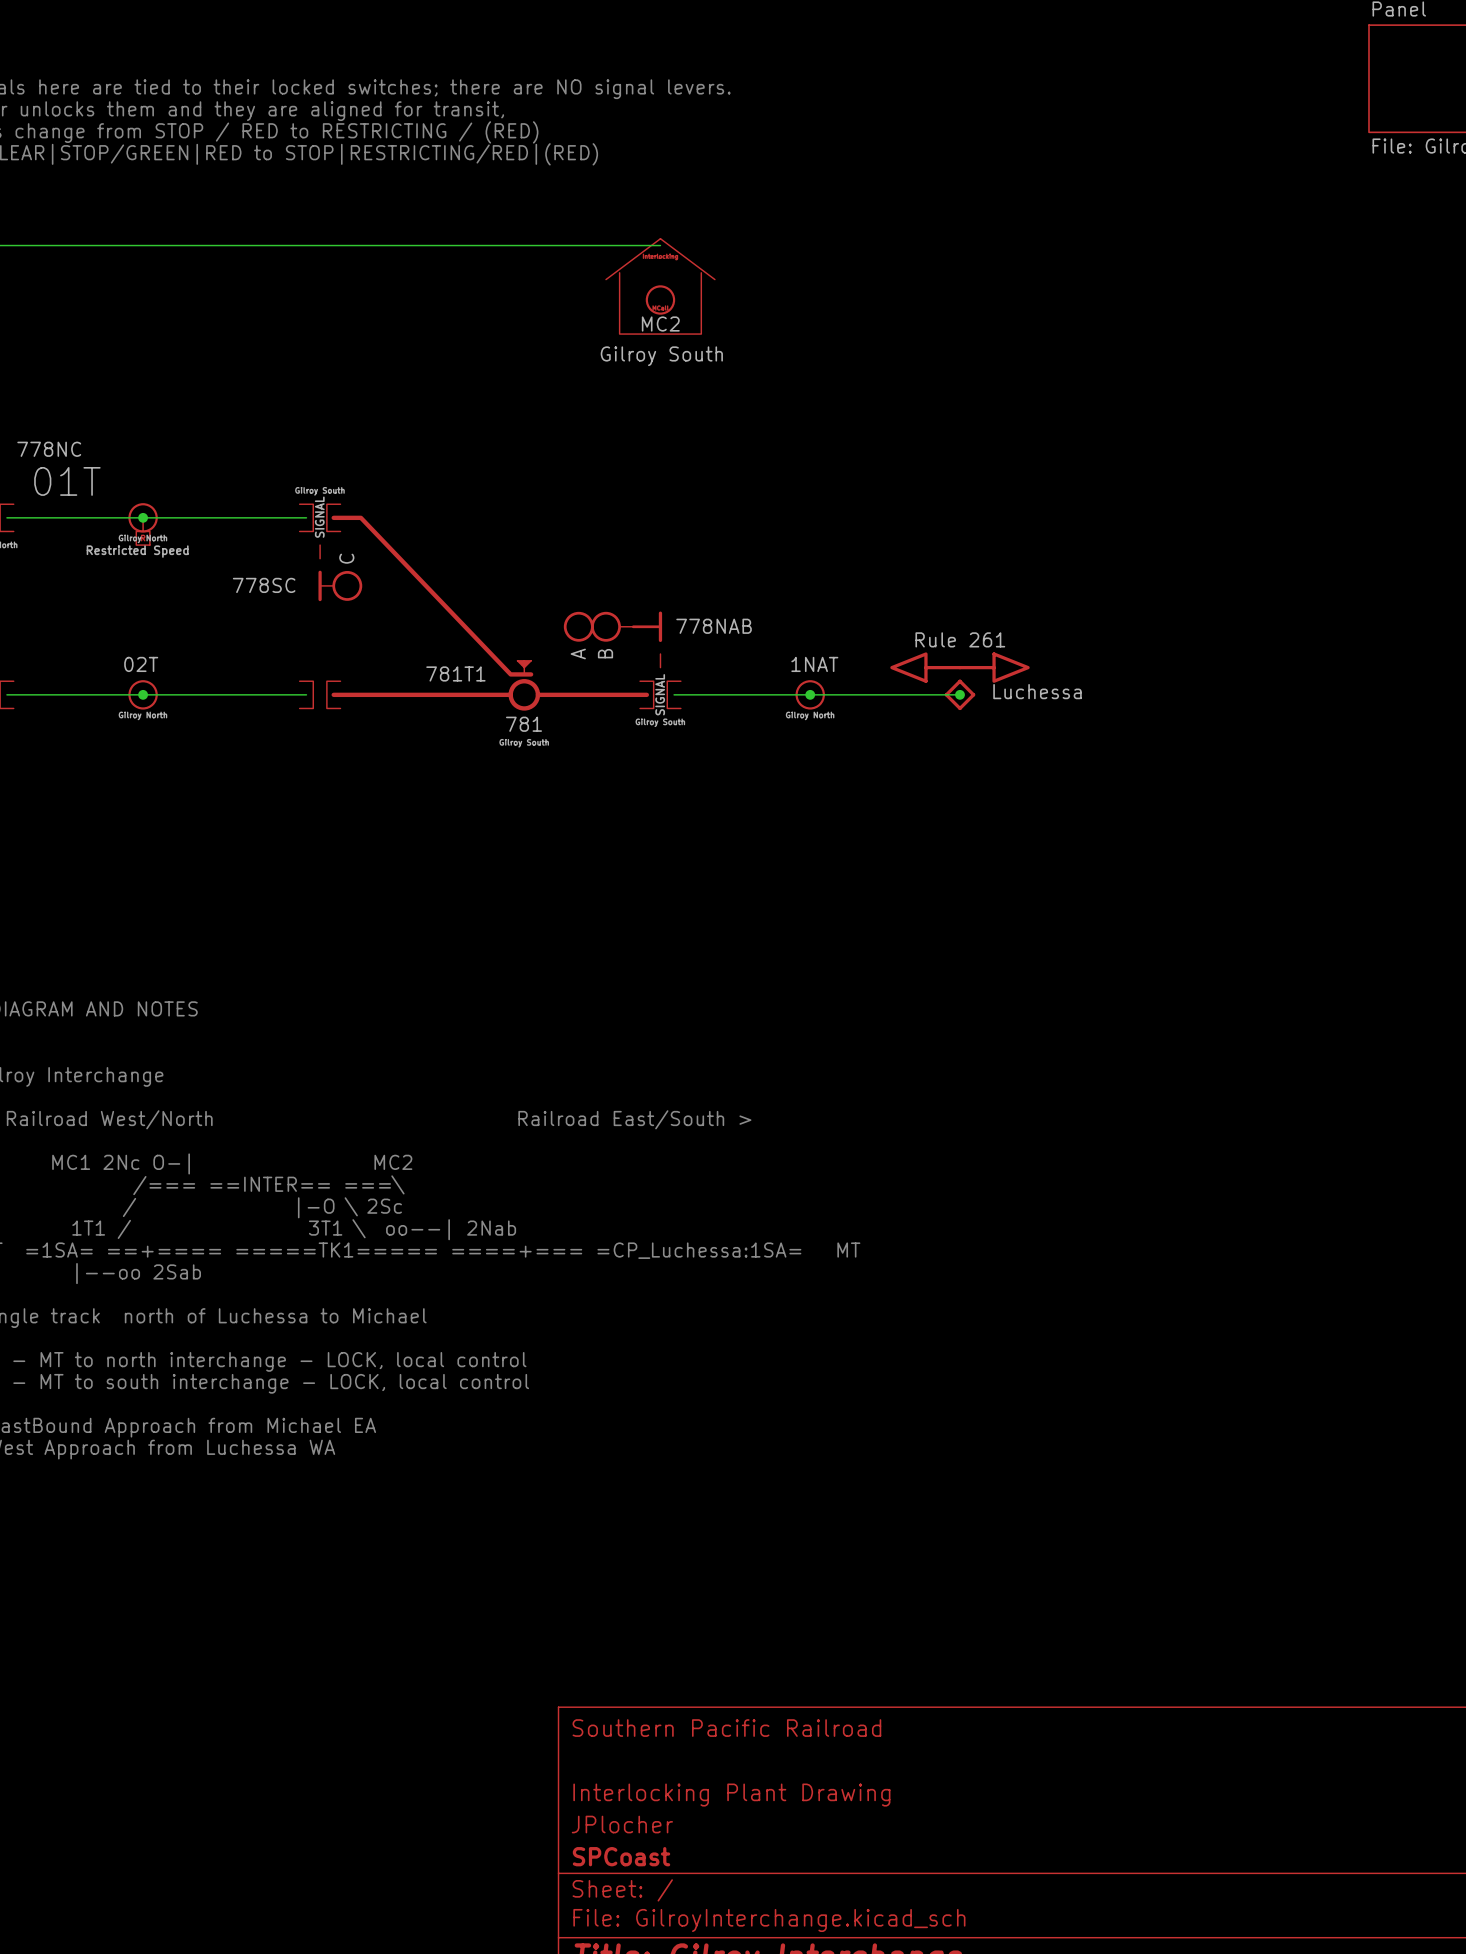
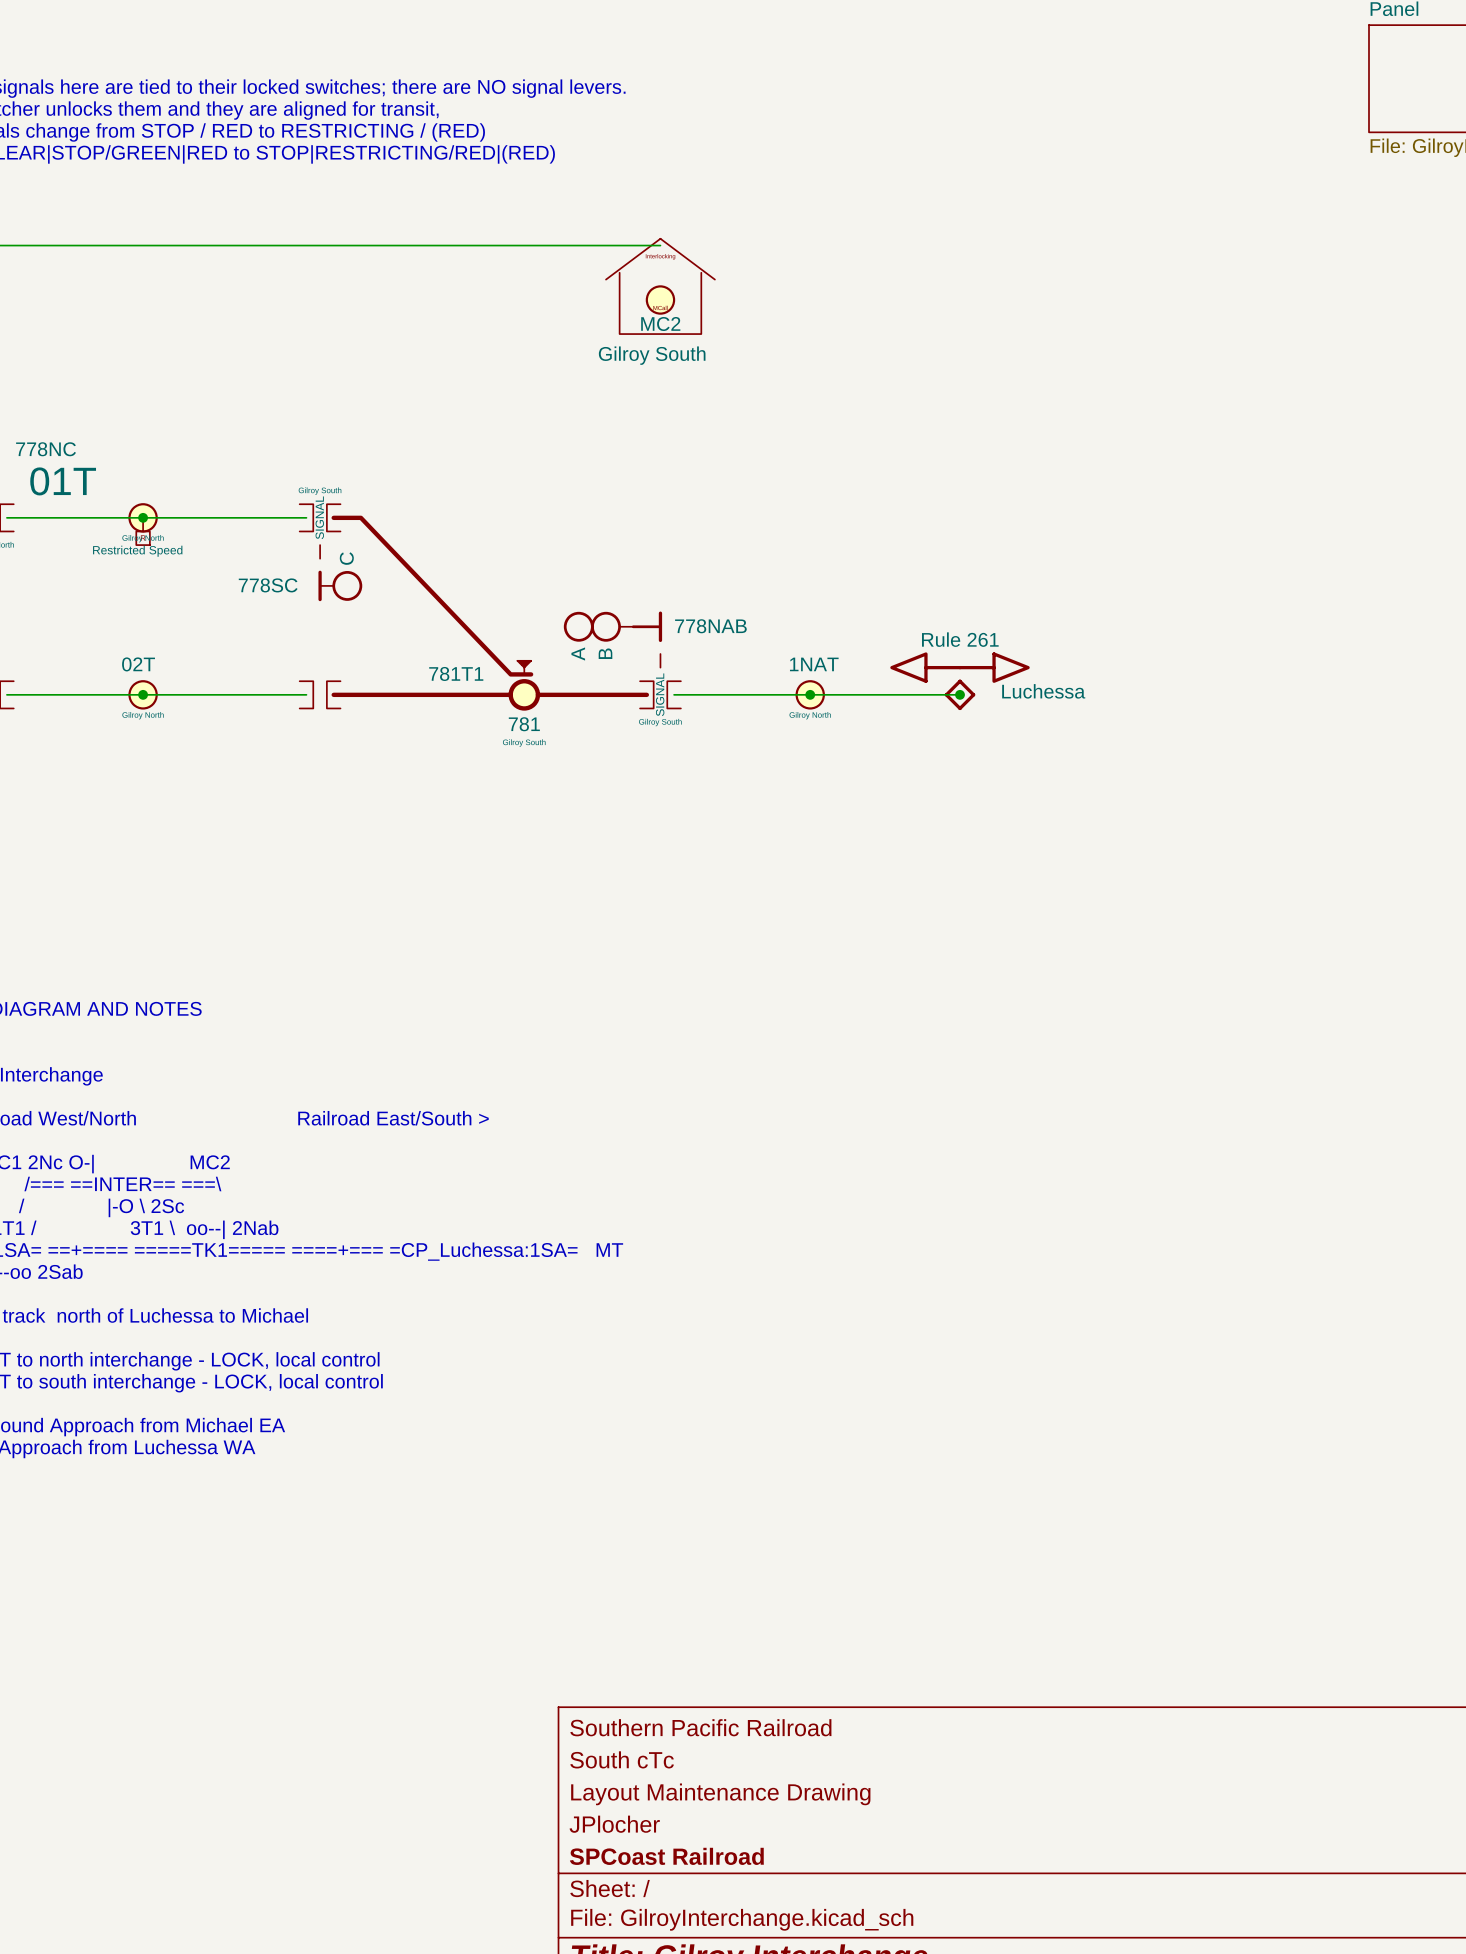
title block: none -> South cTc (622, 1759)
title block: Interlocking Plant Drawing (731, 1795) -> Layout Maintenance Drawing (720, 1794)
title block: SPCoast (621, 1856) -> SPCoast Railroad (666, 1856)

